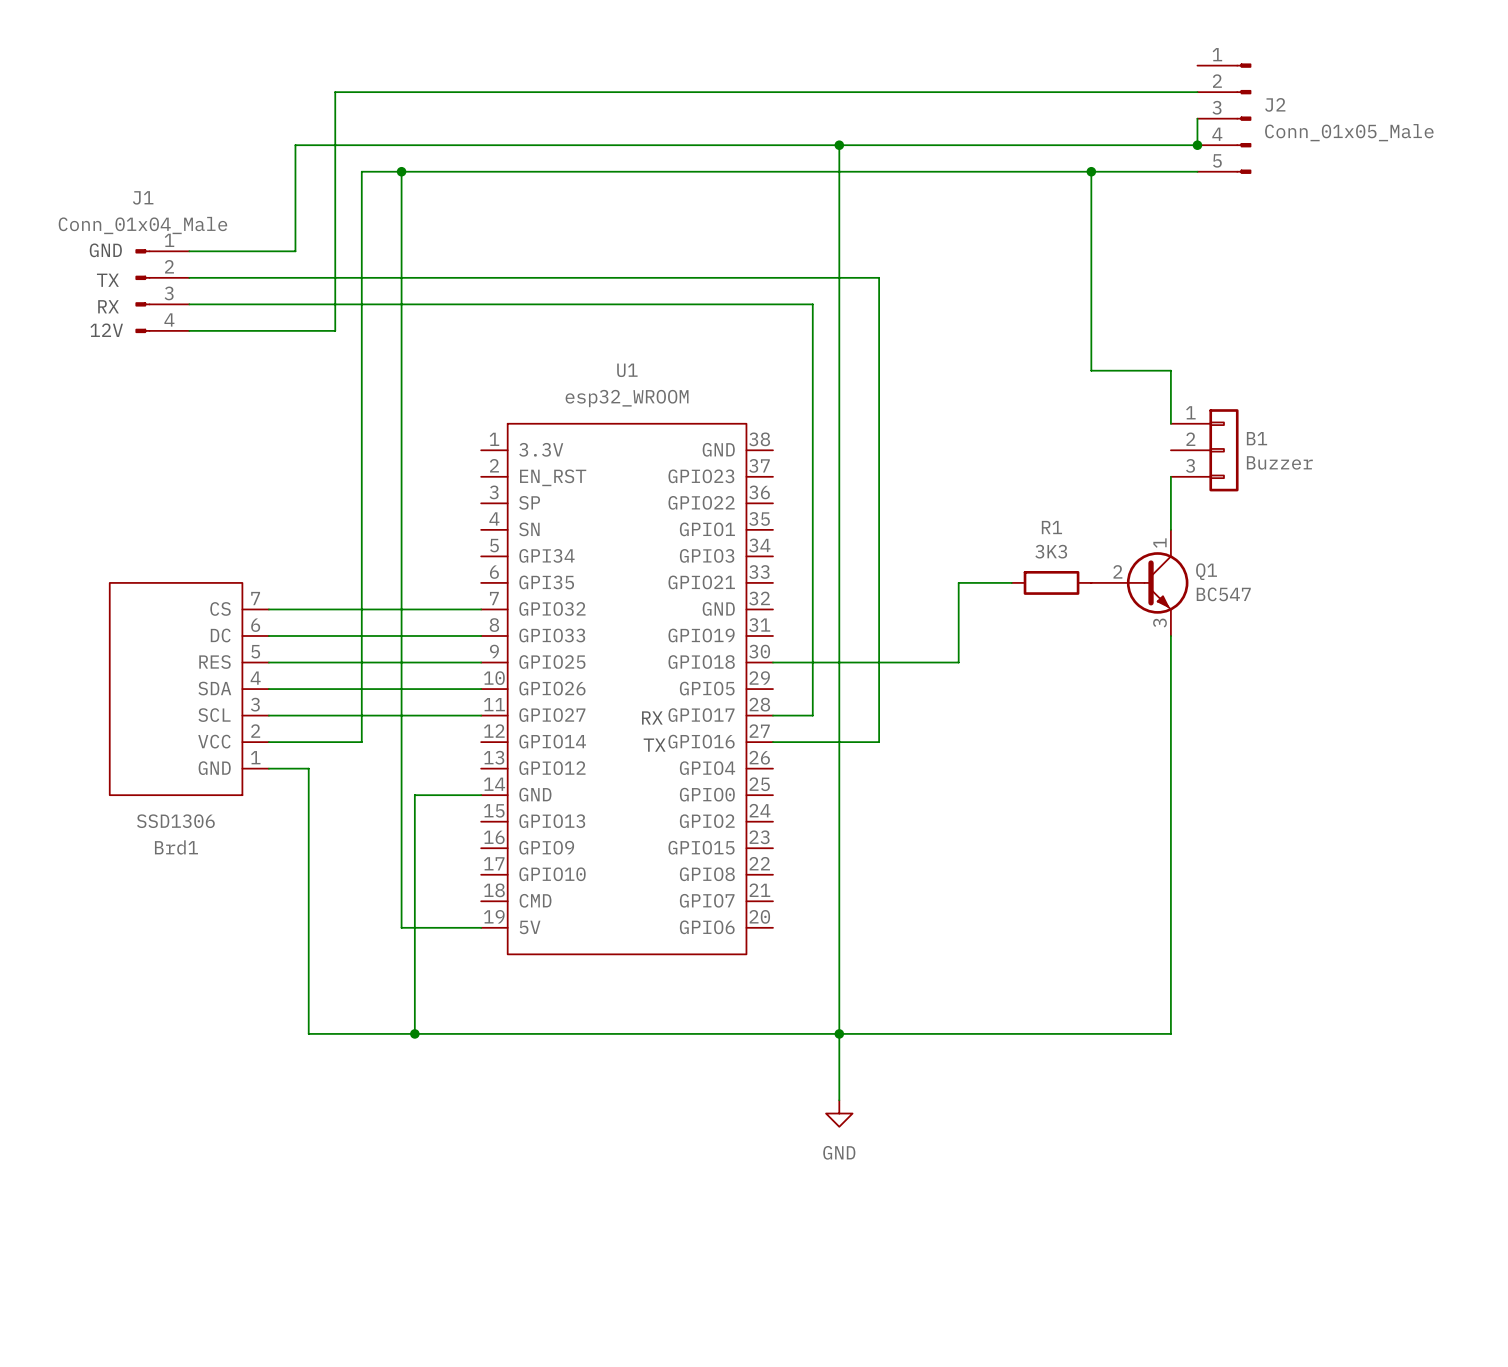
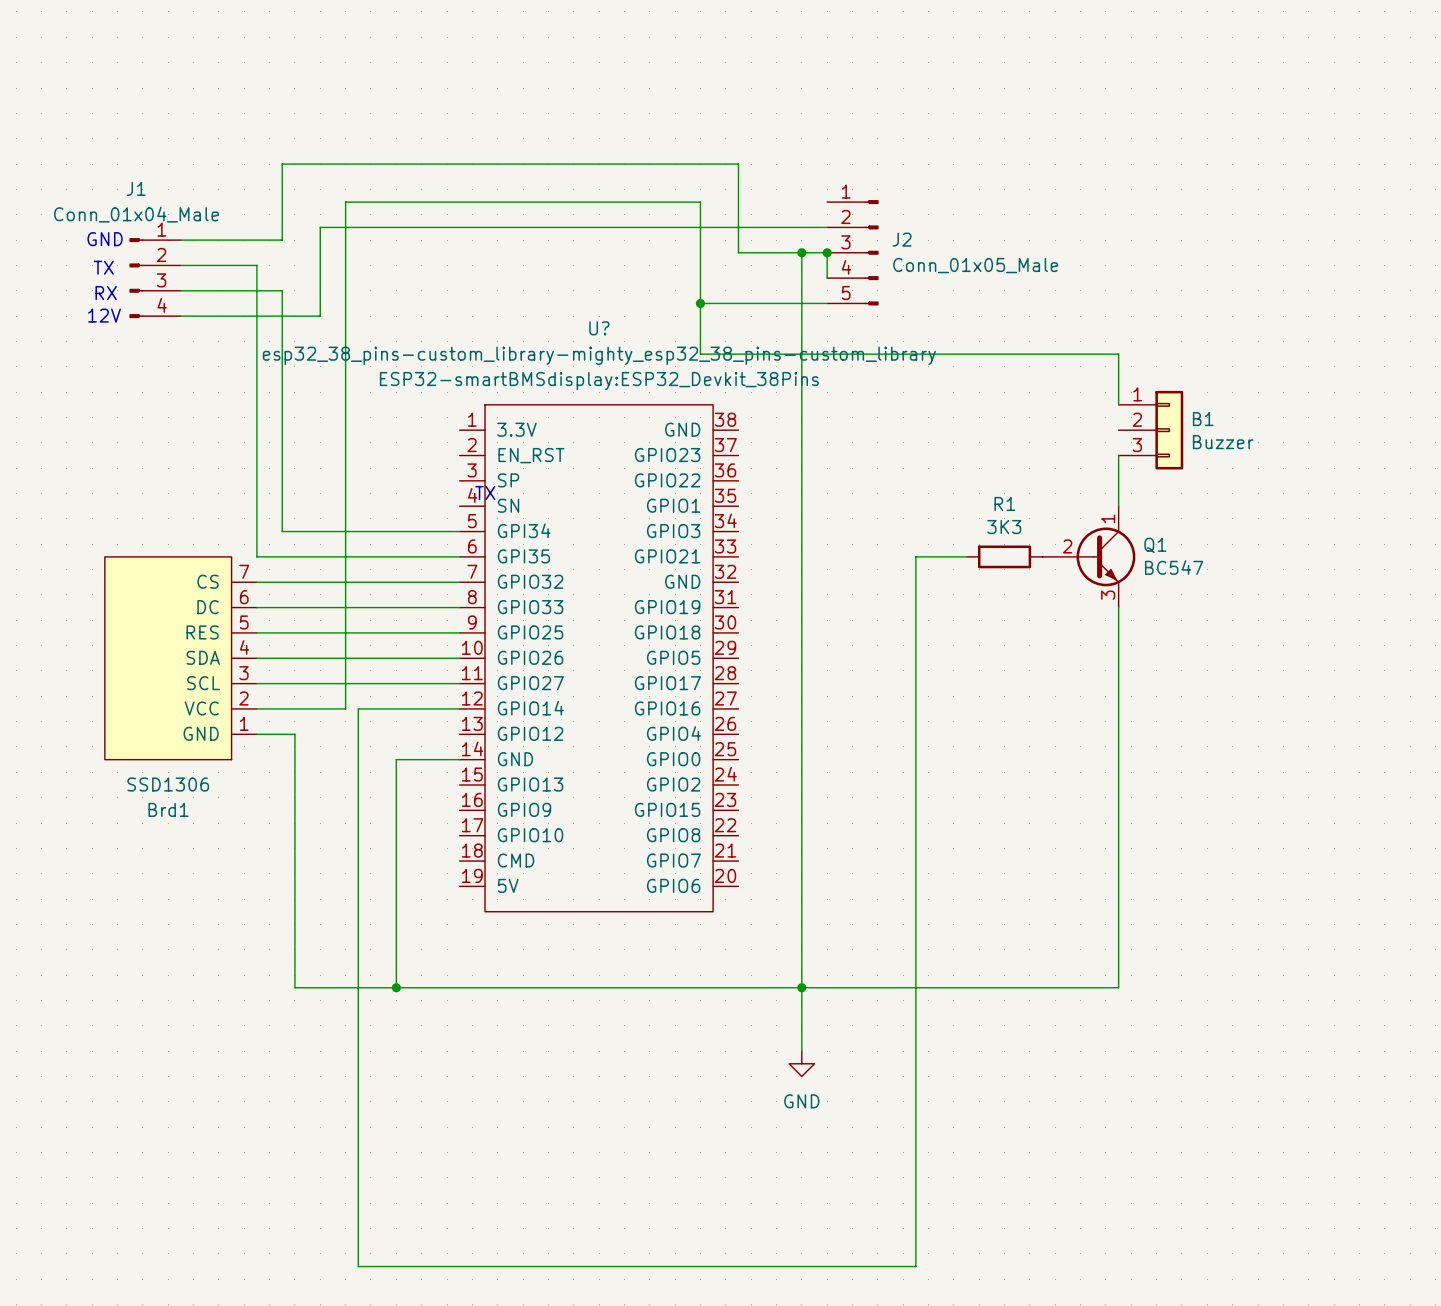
wire: (1197, 92) (335, 92) (335, 238) -> (827, 227) (320, 227)
wire: (1197, 118) (1197, 145) (295, 145) (295, 171) -> none
J2 position: (1224, 118) -> (852, 252)
wire: (839, 145) (839, 264) -> none
junction: (839, 145) -> none
junction: (1197, 145) -> none
wire: (361, 171) (361, 211) -> (345, 164) (282, 164)
wire: (401, 171) (401, 927) (481, 927) -> none
junction: (401, 171) -> none
wire: (772, 171) (1197, 171) -> (738, 164) (738, 252) (827, 252) (827, 278)
wire: (1091, 171) (1091, 370) -> (345, 202) (700, 202) (700, 354) (1042, 354)
junction: (1091, 171) -> none
junction: none -> (801, 252)
junction: none -> (827, 252)
wire: (268, 277) (879, 277) (879, 742) (772, 742) -> (256, 265) (256, 556) (459, 556)
wire: (295, 304) (812, 304) (812, 715) (772, 715) -> (282, 290) (282, 531) (459, 531)
wire: none -> (700, 303) (827, 303)
junction: none -> (700, 303)
U1 name: U1 (627, 370) -> U? (599, 328)
U1 text: none -> ESP32-smartBMSdisplay:ESP32_Devkit_38Pins (599, 381)
U1 value: esp32_WROOM (627, 398) -> esp32_38_pins-custom_library-mighty_esp32_38_pins-custom_library (599, 355)
text: none -> TX (485, 493)
wire: (772, 662) (958, 662) -> (459, 708) (358, 708) (358, 1266) (915, 1266) (915, 632)
text: RX (652, 717) -> none
text: TX (654, 745) -> none

